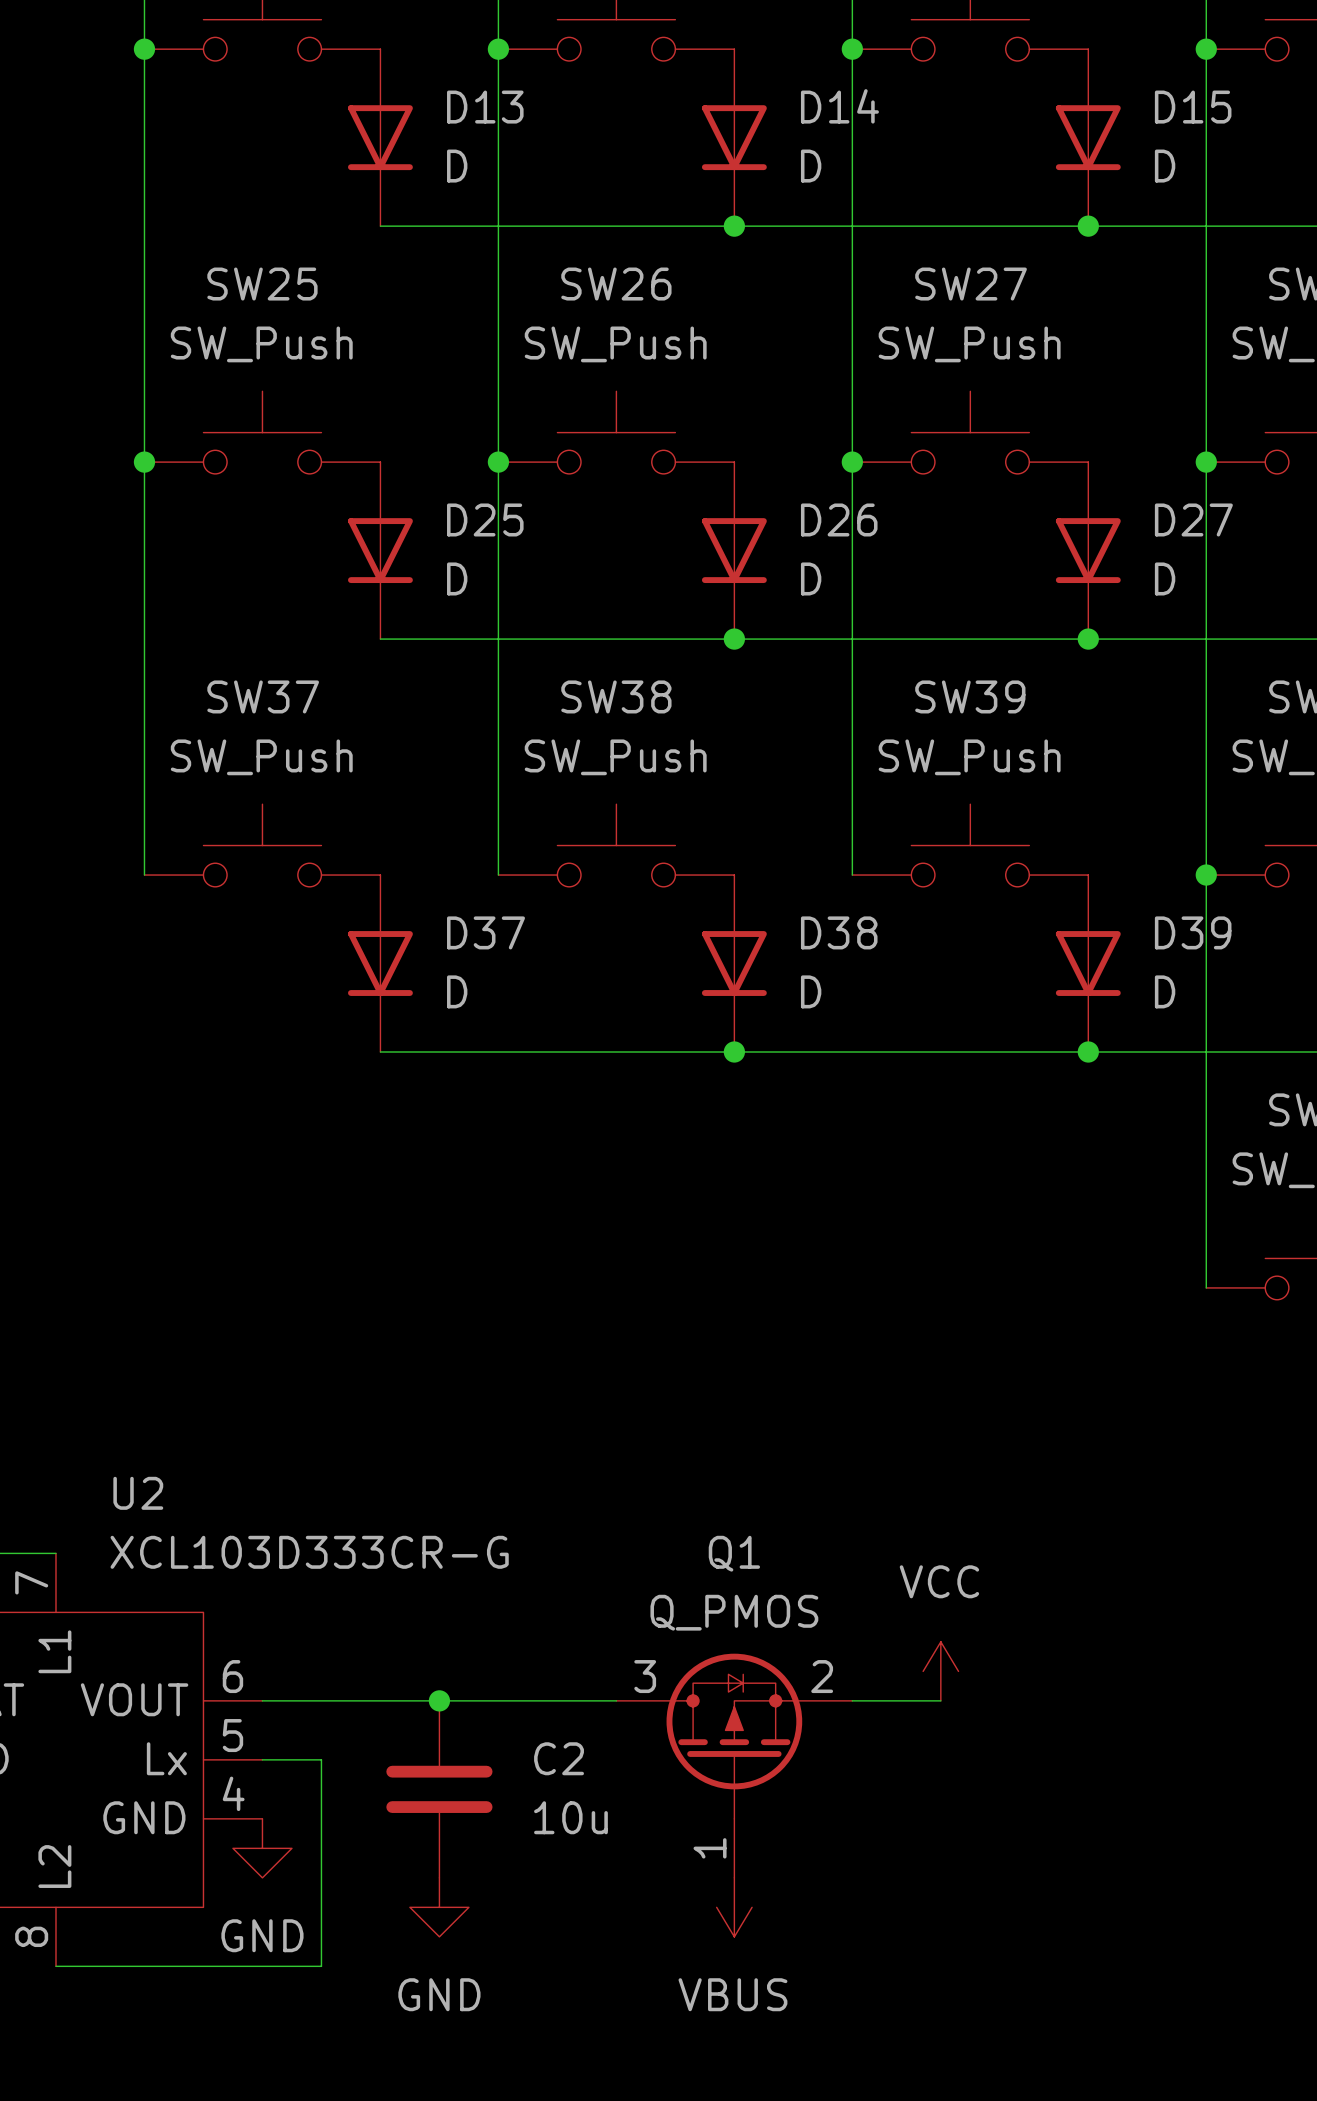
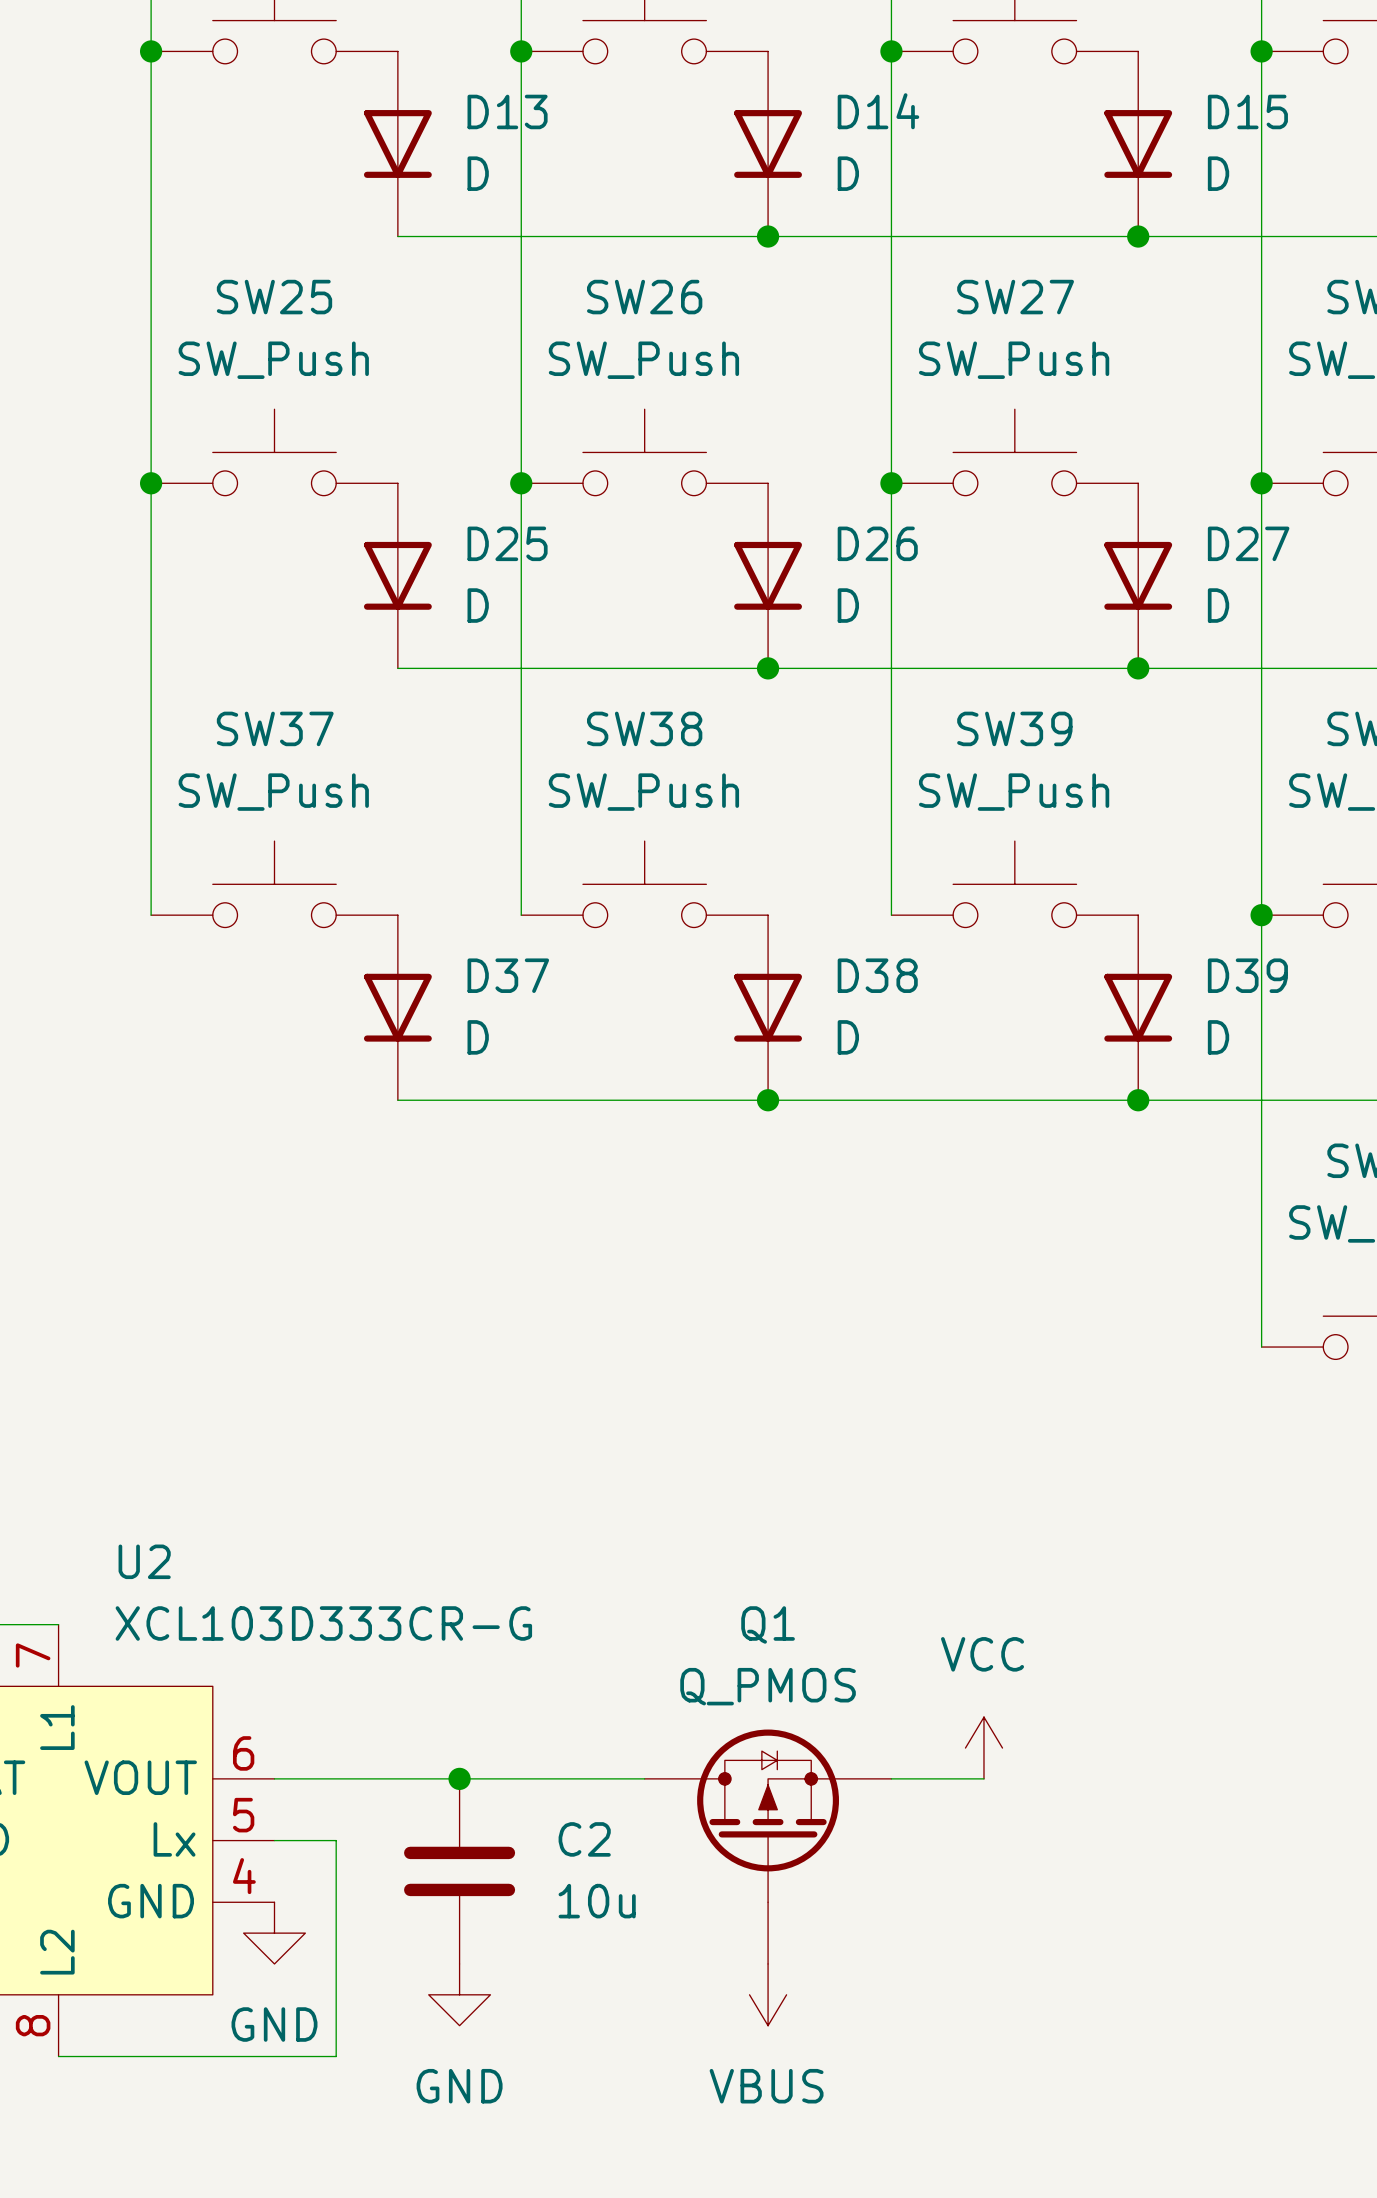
Q1 pin number: 3 (645, 1676) -> none
Q1 pin number: 2 (822, 1676) -> none
Q1 pin number: 1 (710, 1848) -> none

